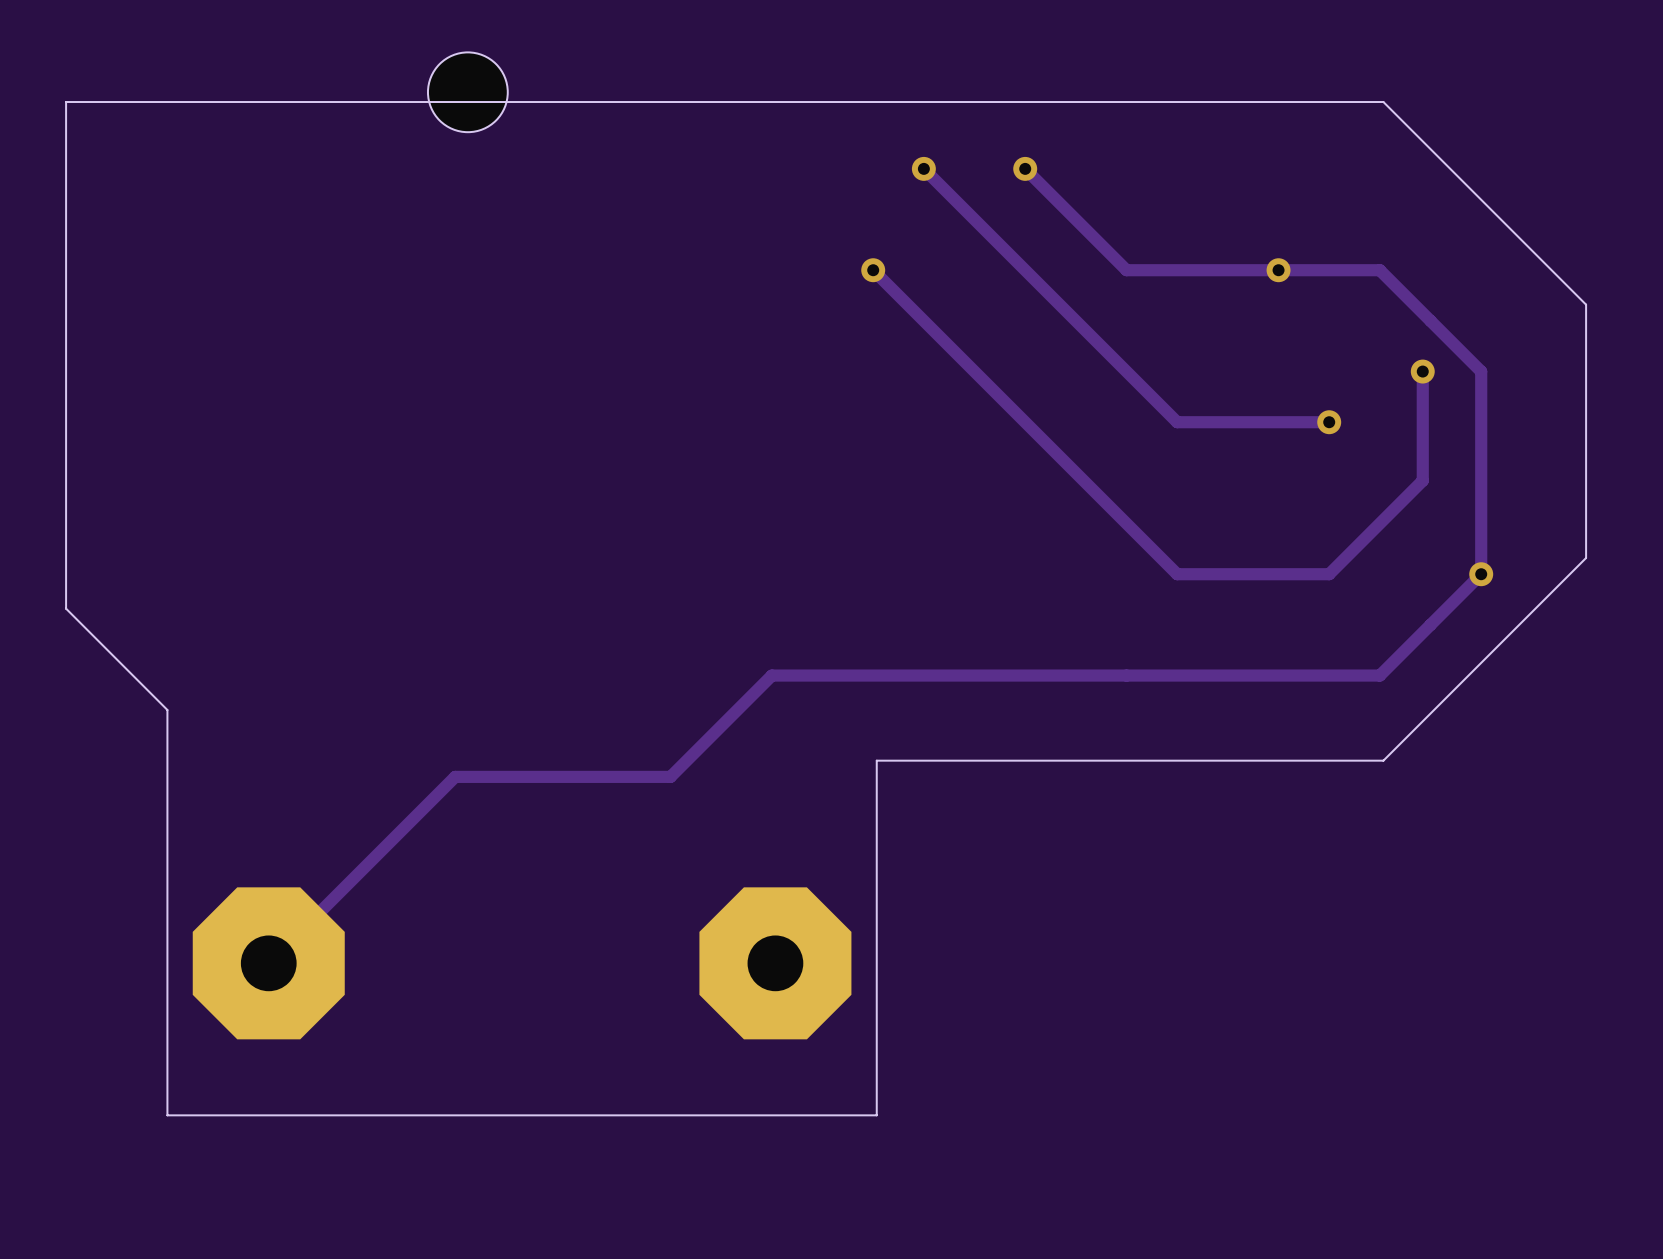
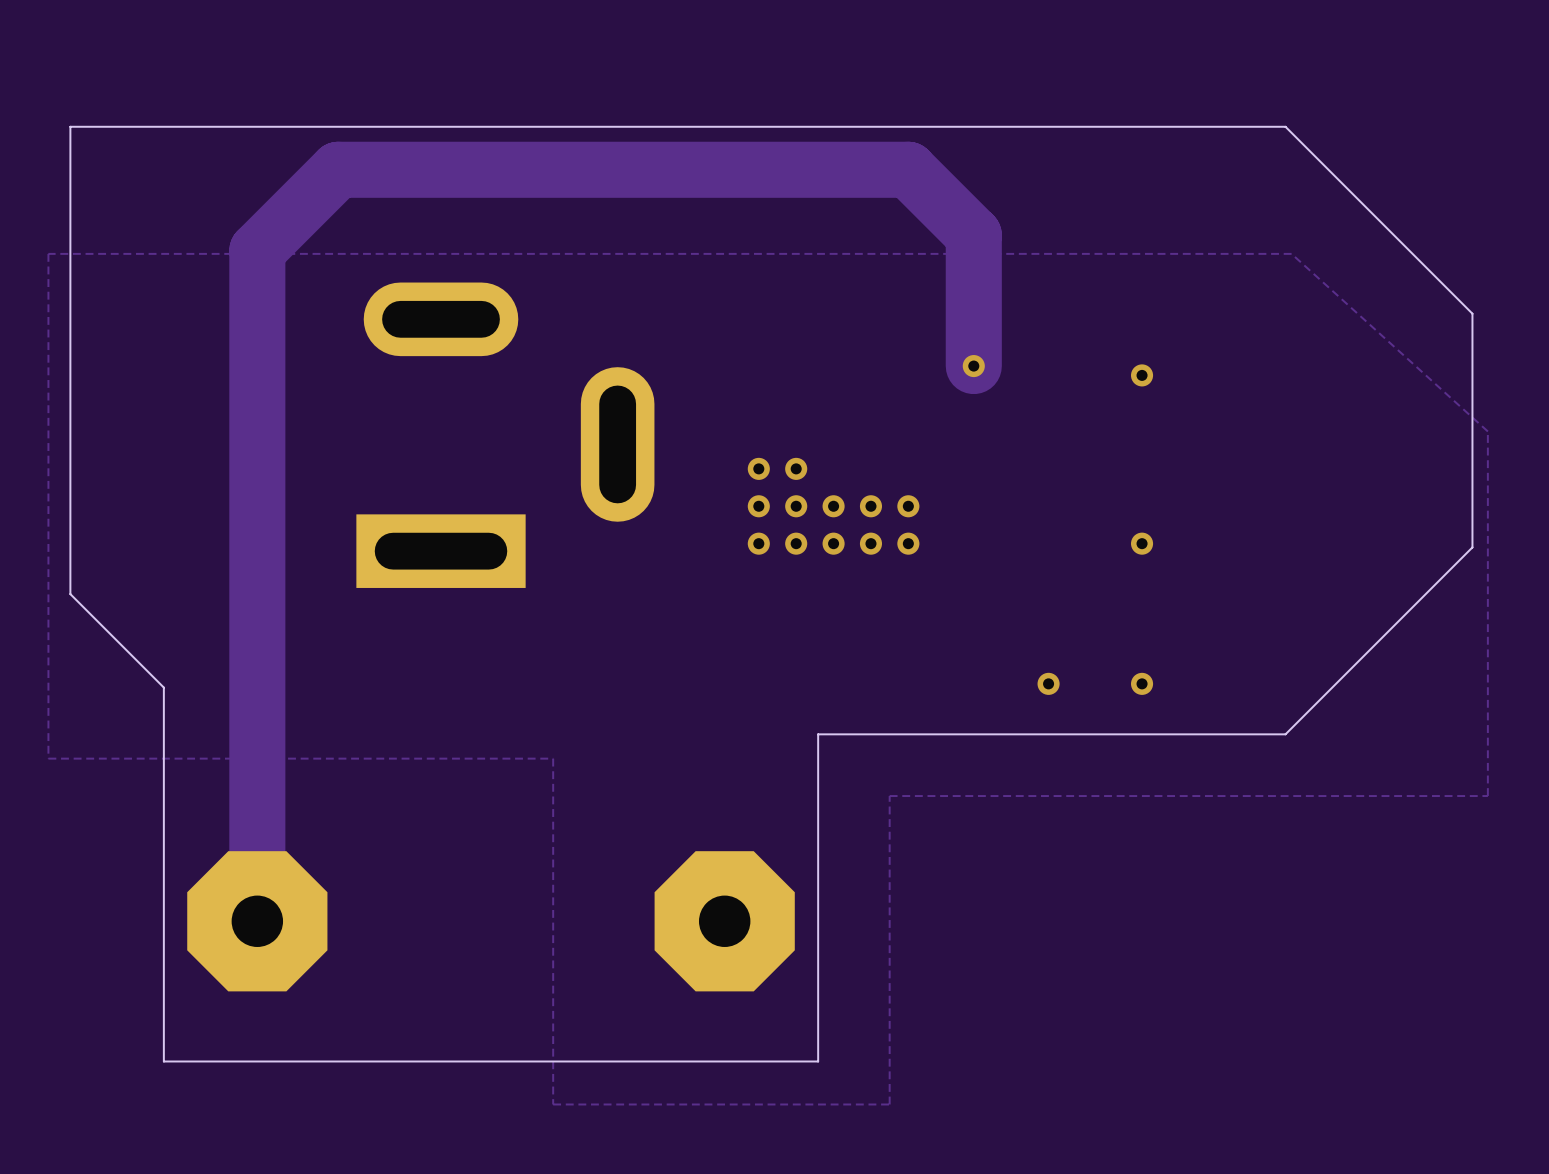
part: (467, 92) -> none
track: (923, 168) (1177, 422) (1329, 422) -> none
via: (923, 168) -> none
track: (1025, 168) (1126, 270) (1379, 270) (1481, 371) (1481, 574) (1379, 675) (771, 675) (670, 776) (455, 776) (268, 963) -> (973, 366) (973, 235) (908, 169) (338, 169) (257, 250) (257, 921)
via: (1025, 168) -> none
zone outline: none -> (1291, 253) (1487, 431) (1487, 796) (889, 796) (889, 1104) (553, 1104) (553, 758) (48, 758) (48, 253) (1291, 253)
track: (873, 270) (1177, 574) (1329, 574) (1422, 480) (1422, 371) -> none
via: (873, 270) -> none
via: (1278, 270) -> none
via: none -> (973, 366)
via: none -> (1142, 375)
via: (1422, 371) -> none
via: (1329, 422) -> none
part: none -> (505, 435)
via: none -> (758, 468)
via: none -> (796, 468)
via: none -> (758, 506)
via: none -> (796, 506)
via: none -> (833, 506)
via: none -> (870, 506)
via: none -> (908, 506)
via: none -> (758, 543)
via: none -> (796, 543)
via: none -> (833, 543)
via: none -> (870, 543)
via: none -> (908, 543)
via: none -> (1142, 543)
via: (1481, 574) -> none
via: none -> (1048, 683)
via: none -> (1142, 683)

